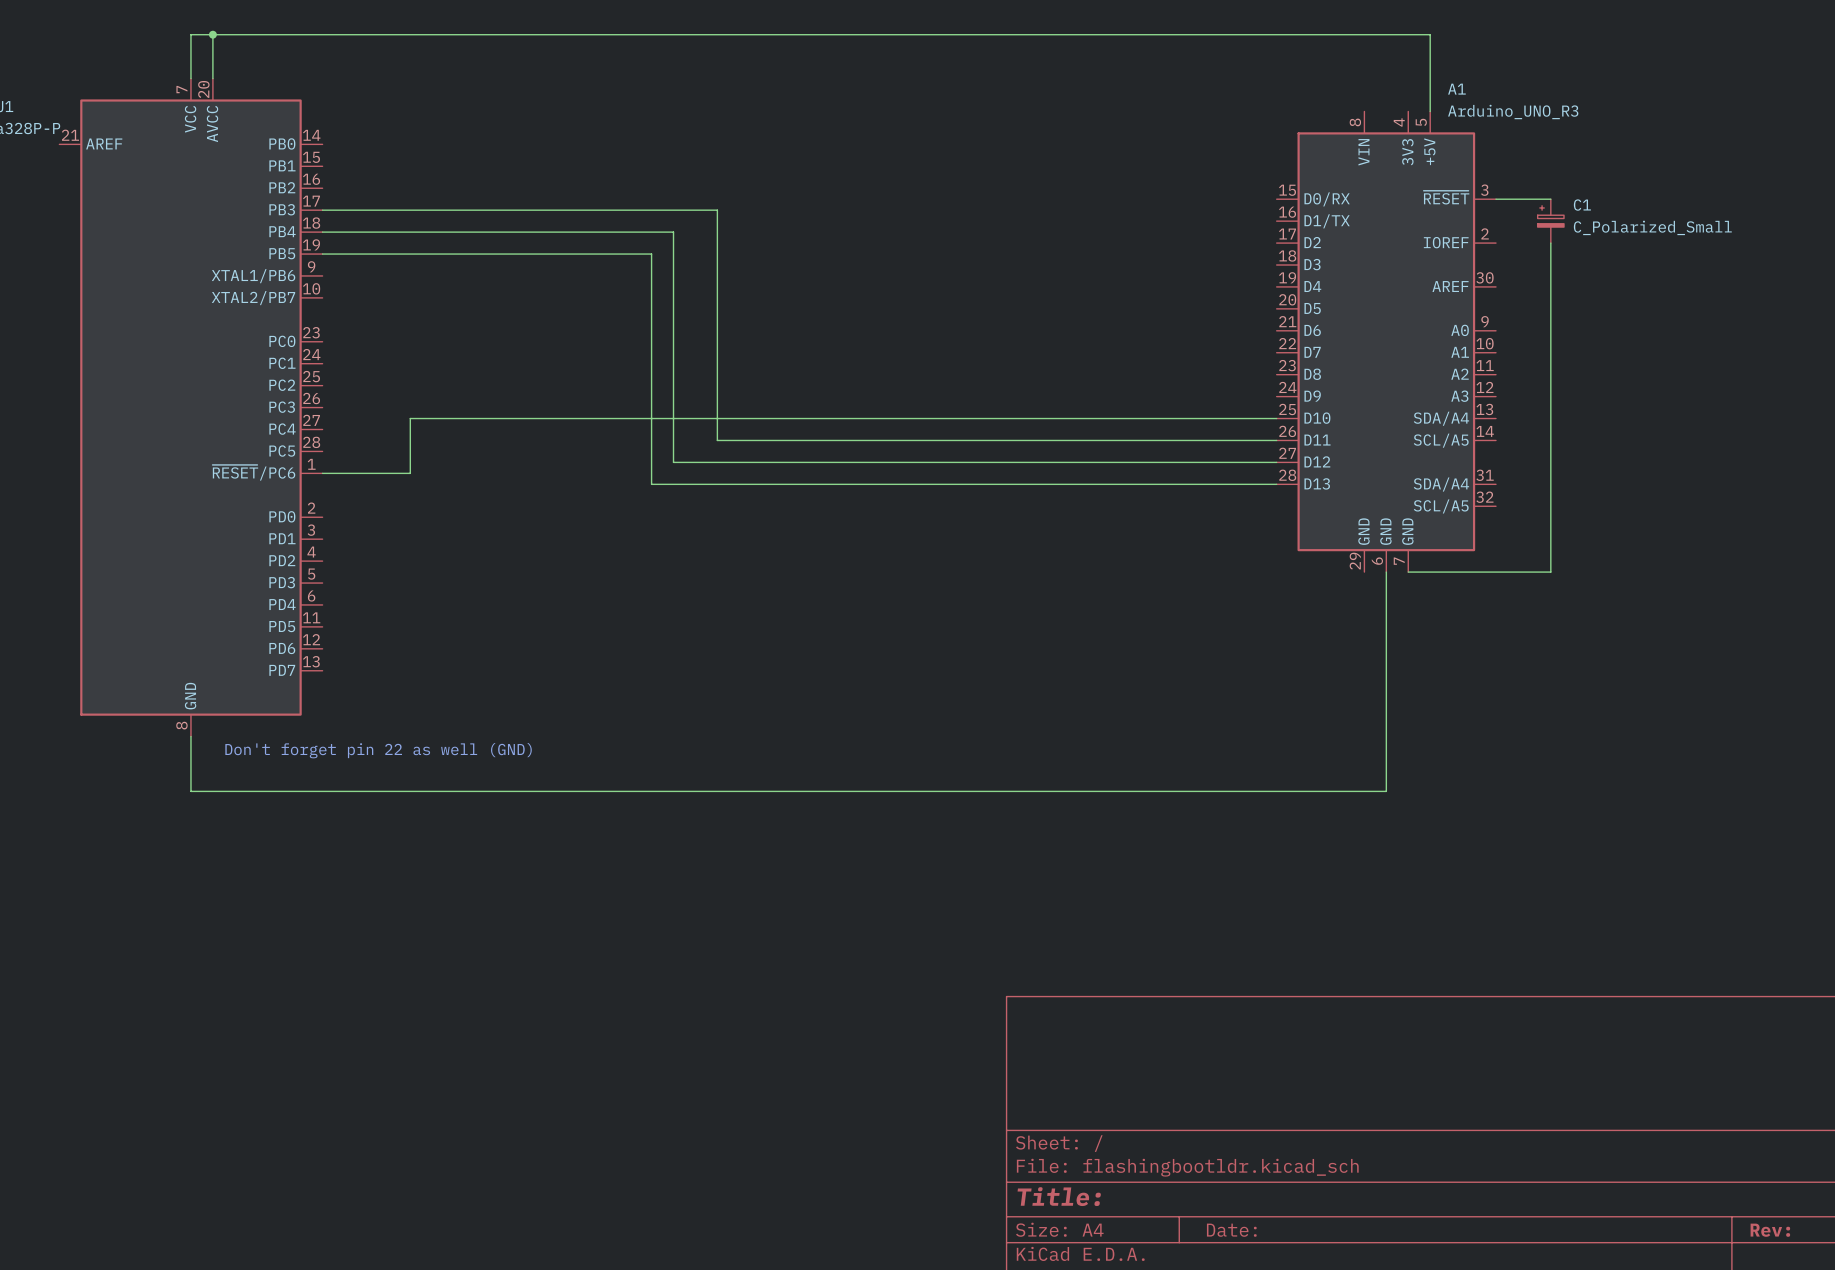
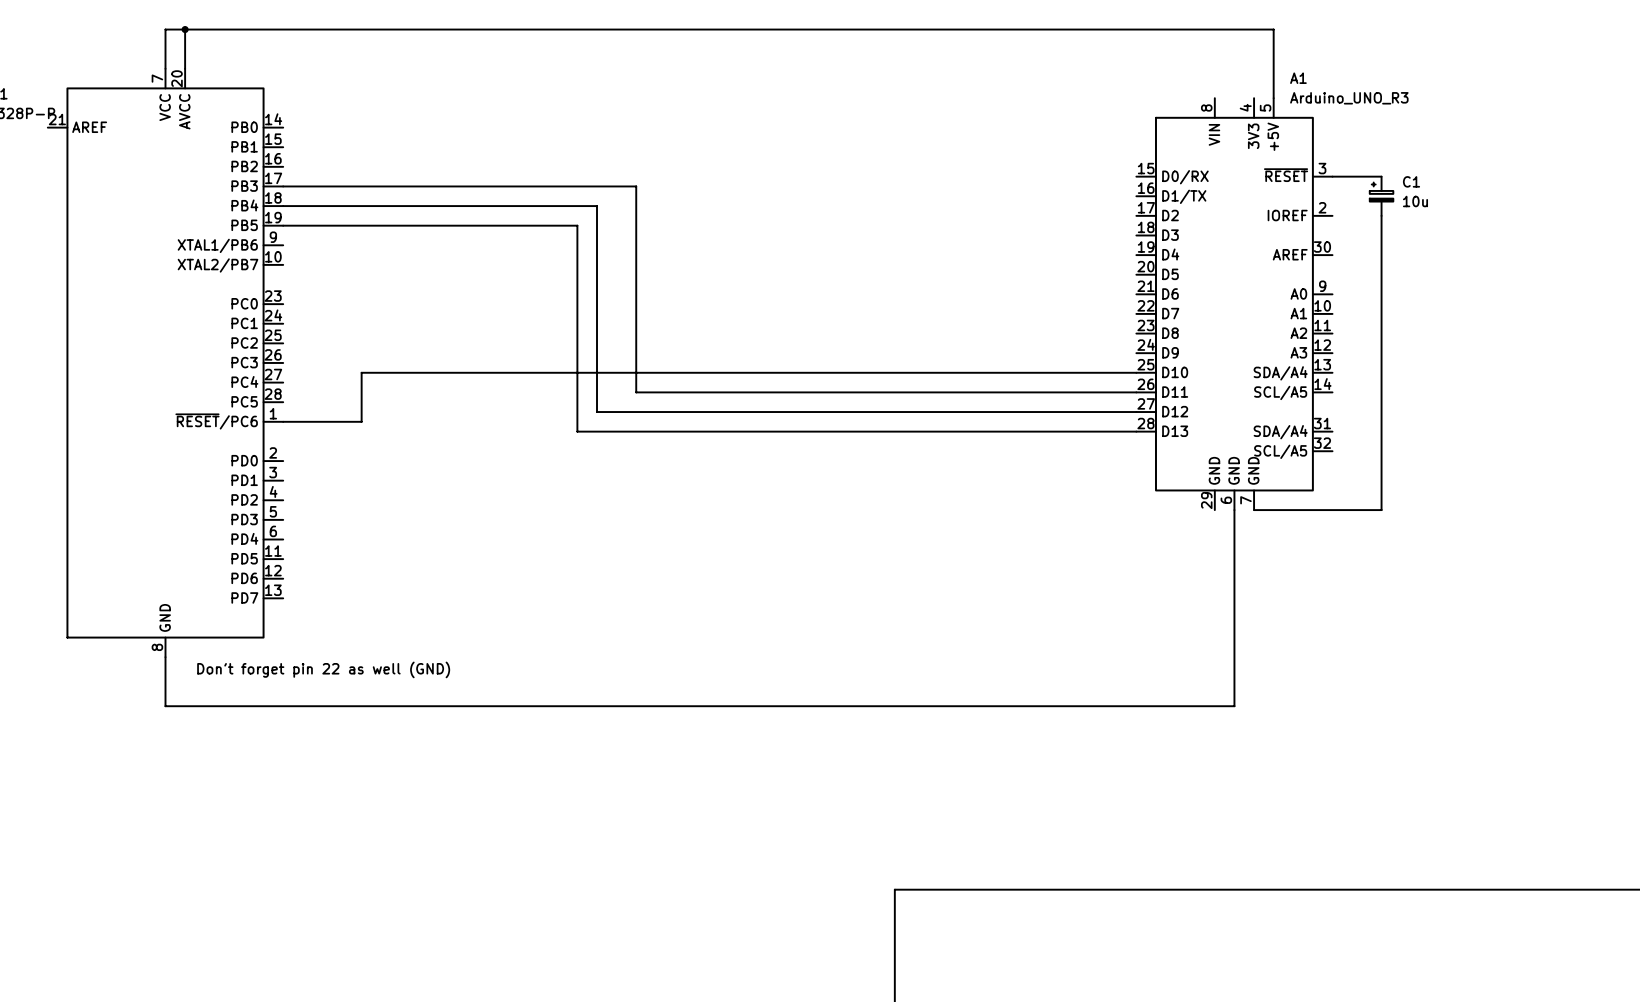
C1 value: C_Polarized_Small (1652, 227) -> 10u (1415, 201)

